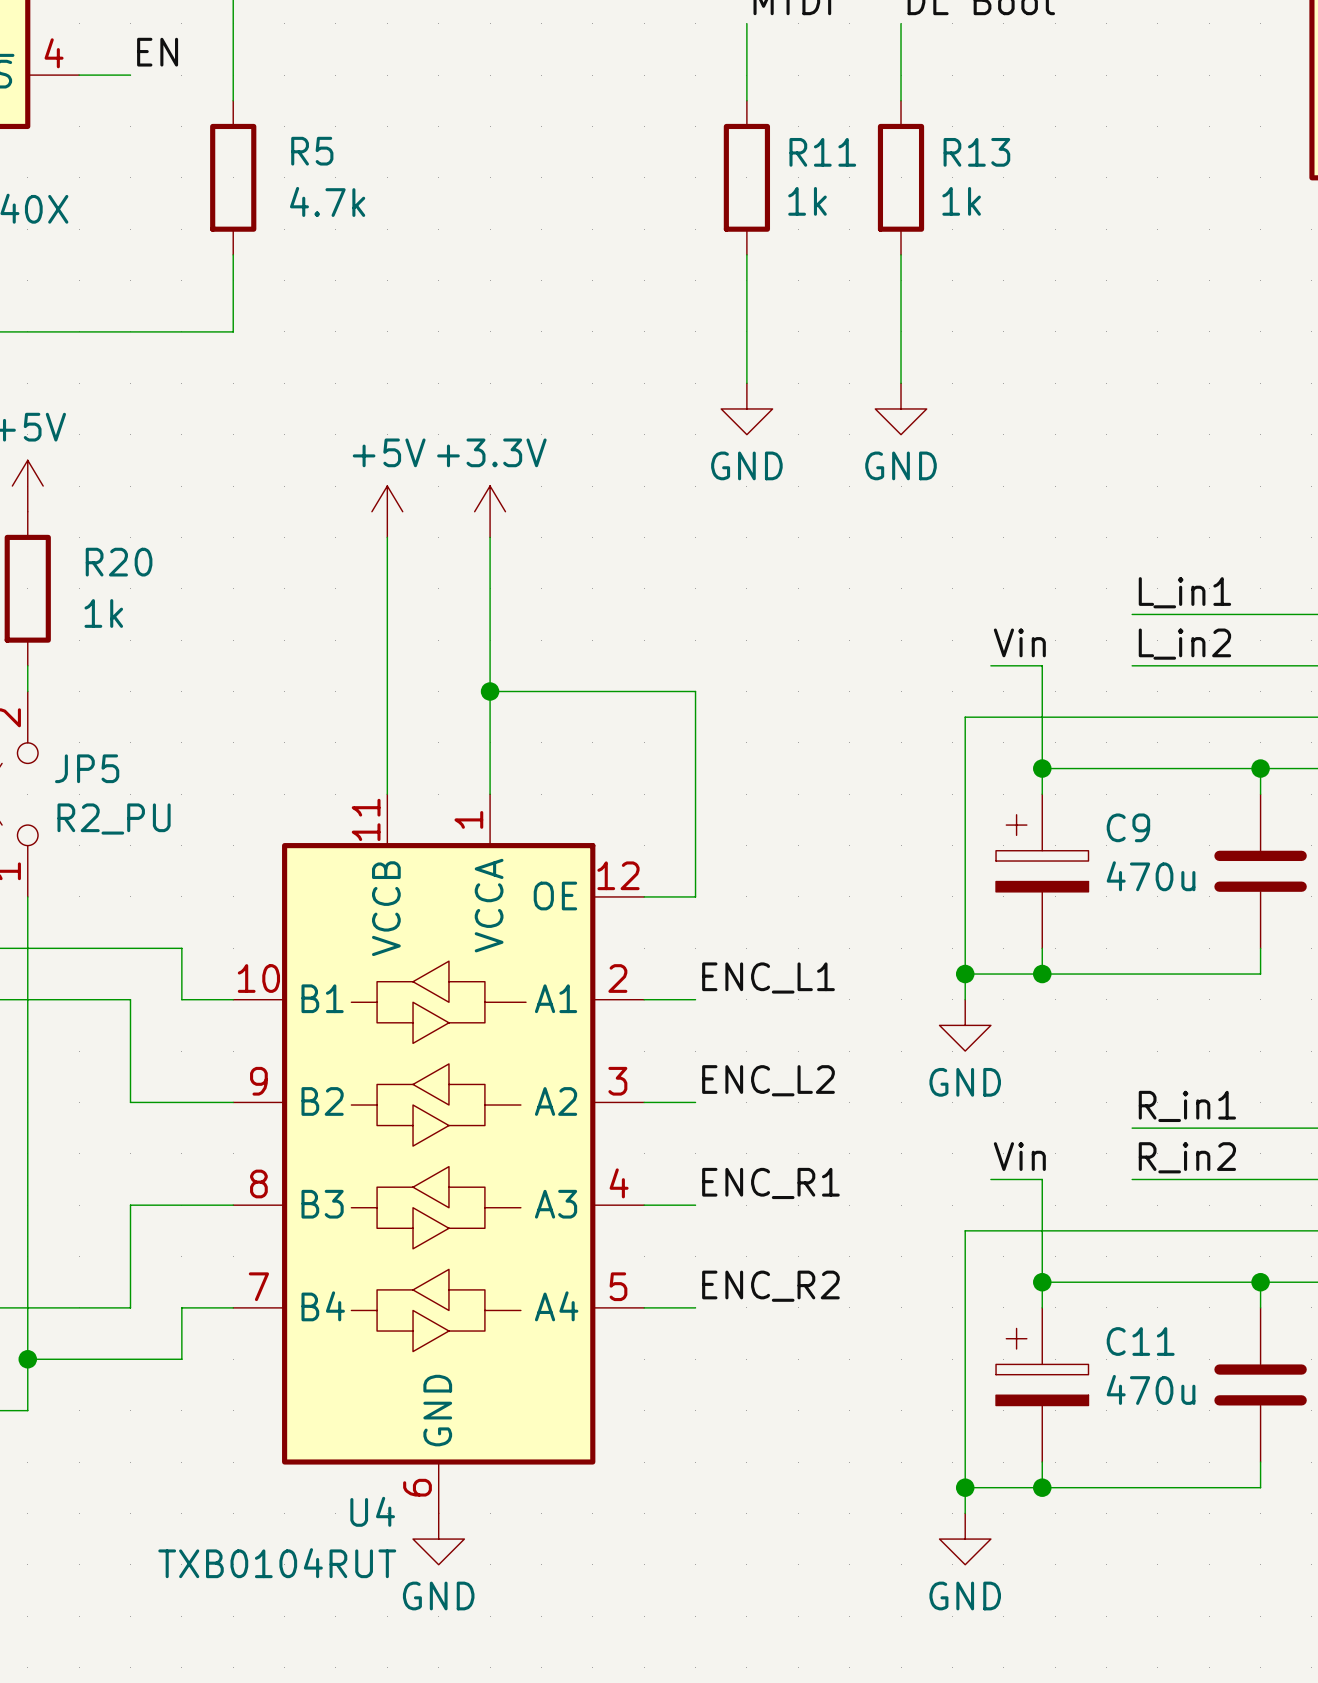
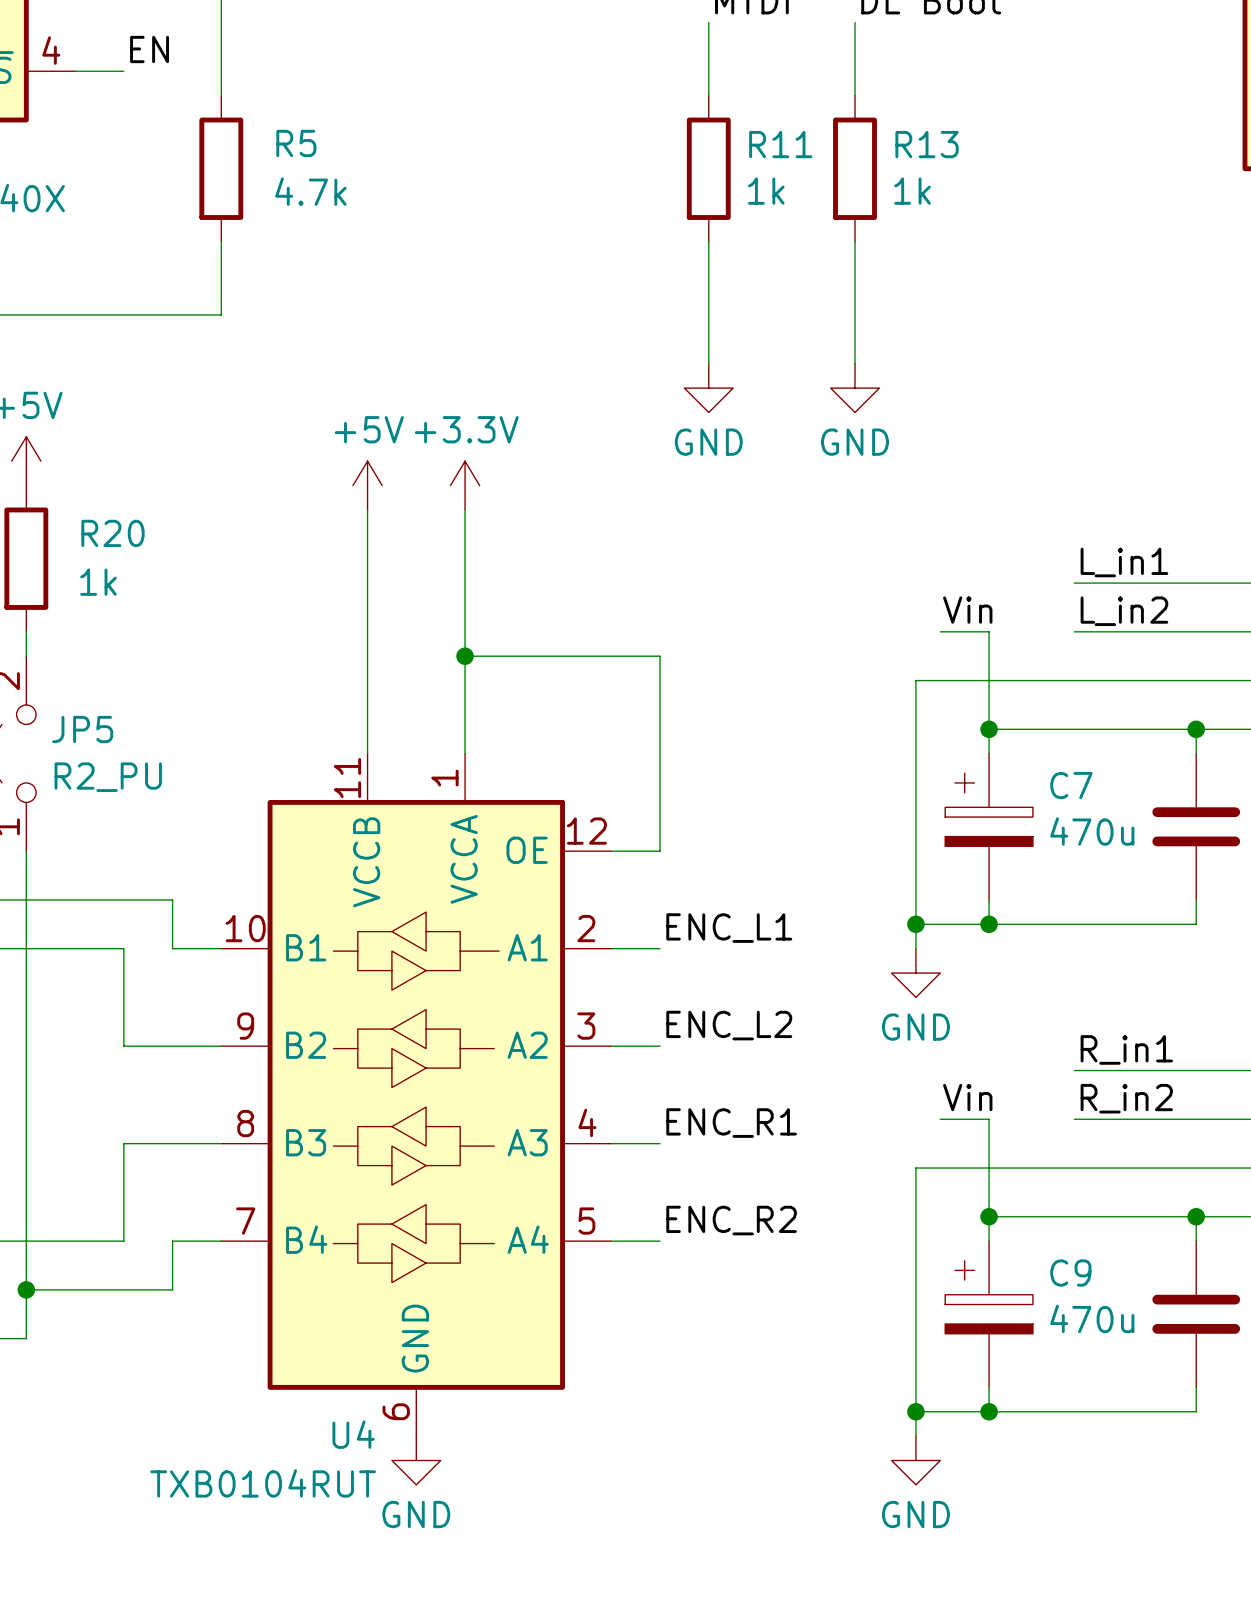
C9 name: C9 (1128, 827) -> C7 (1071, 785)
C11 name: C11 (1140, 1341) -> C9 (1070, 1273)

